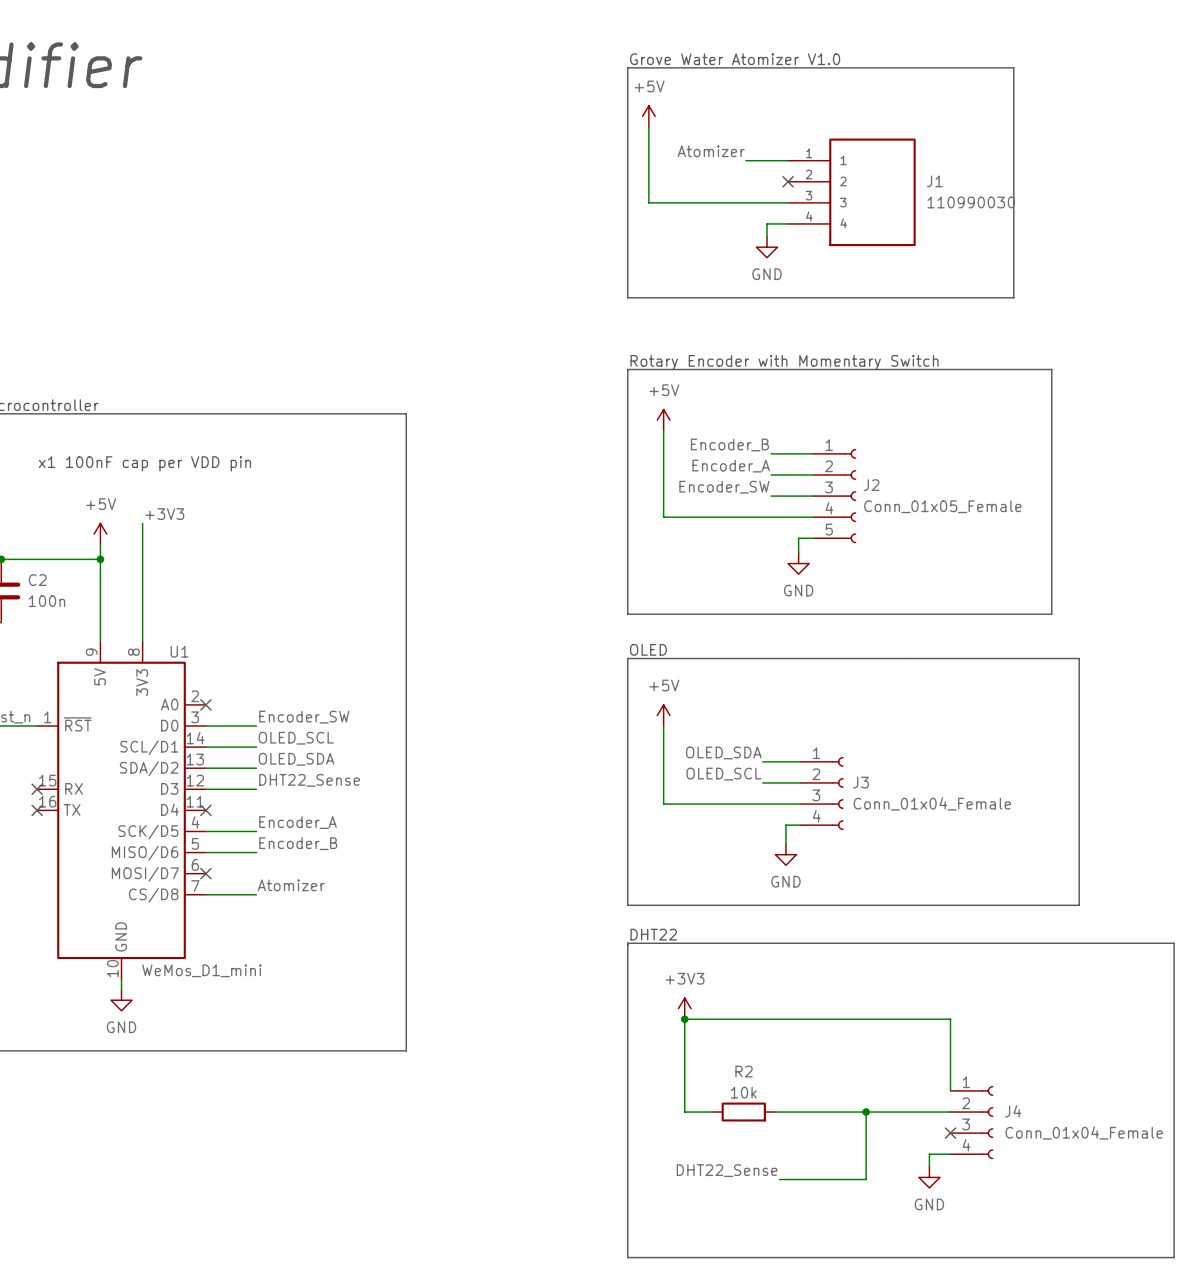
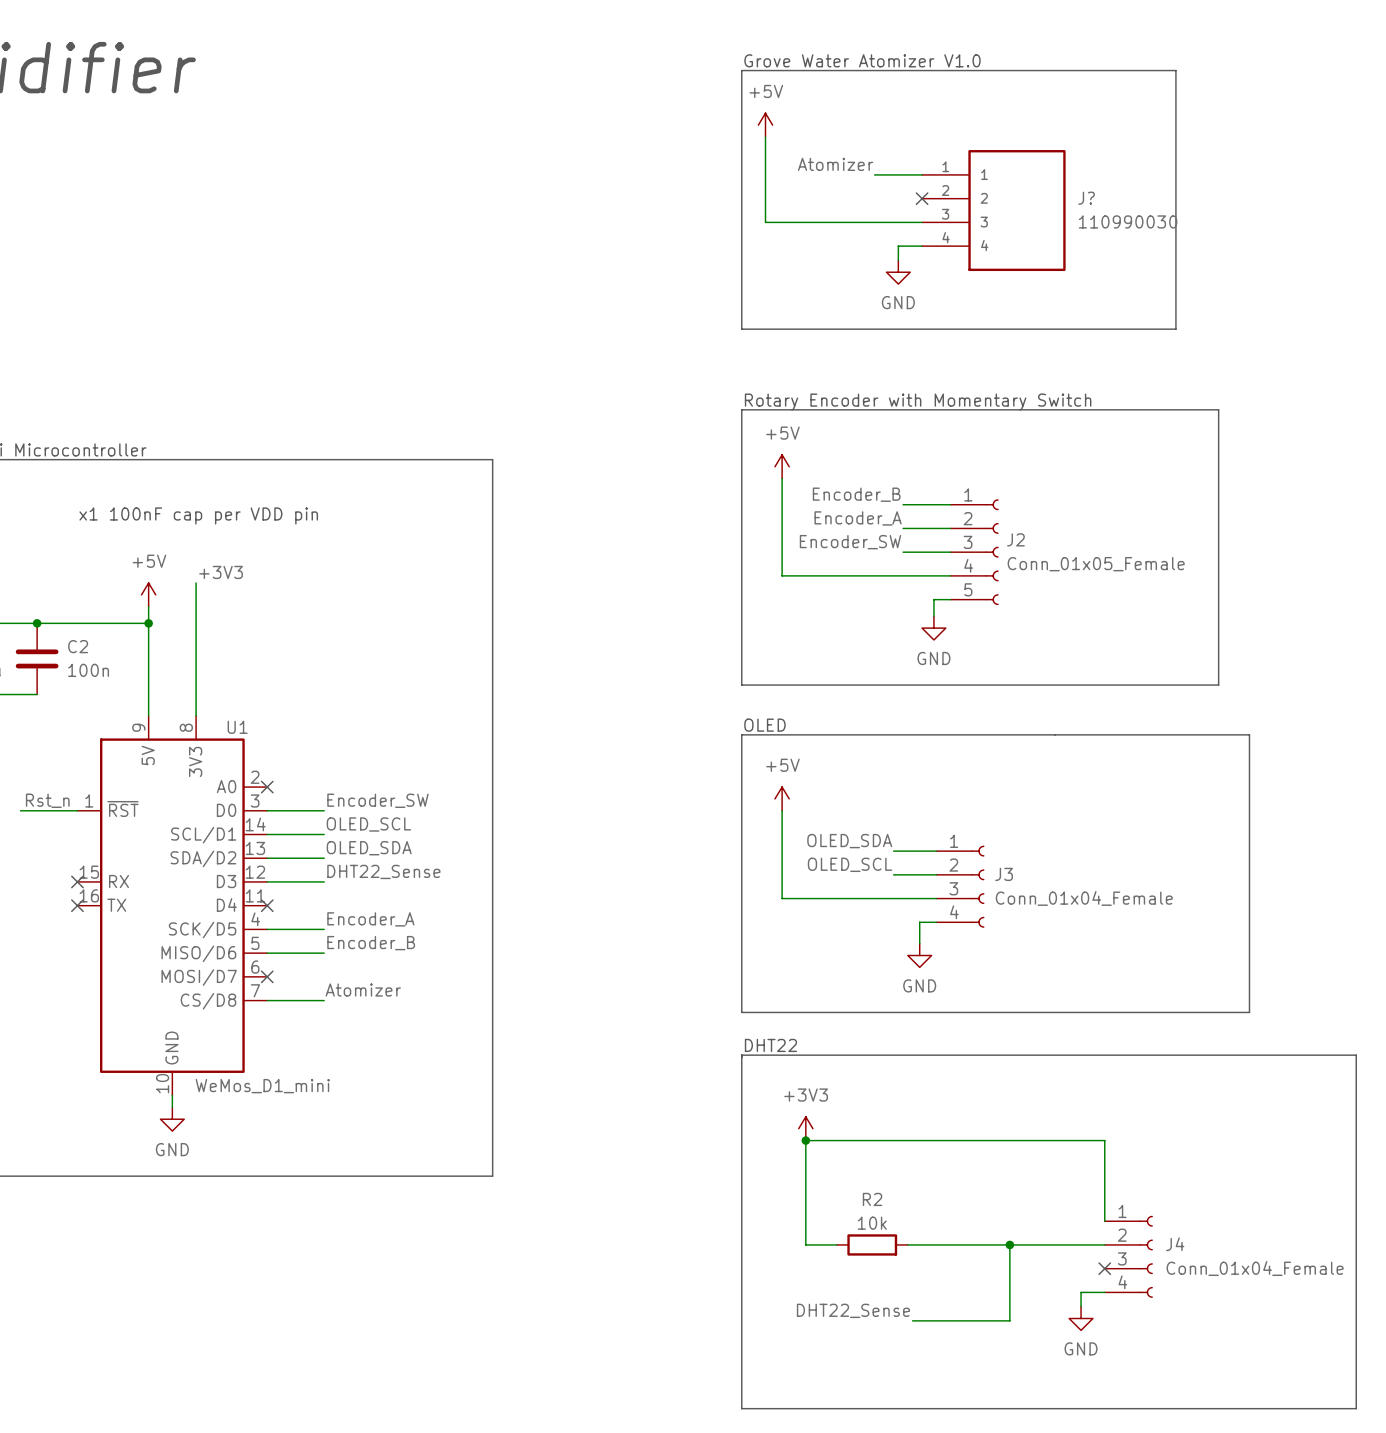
J1 name: J1 (934, 181) -> J? (1086, 198)

